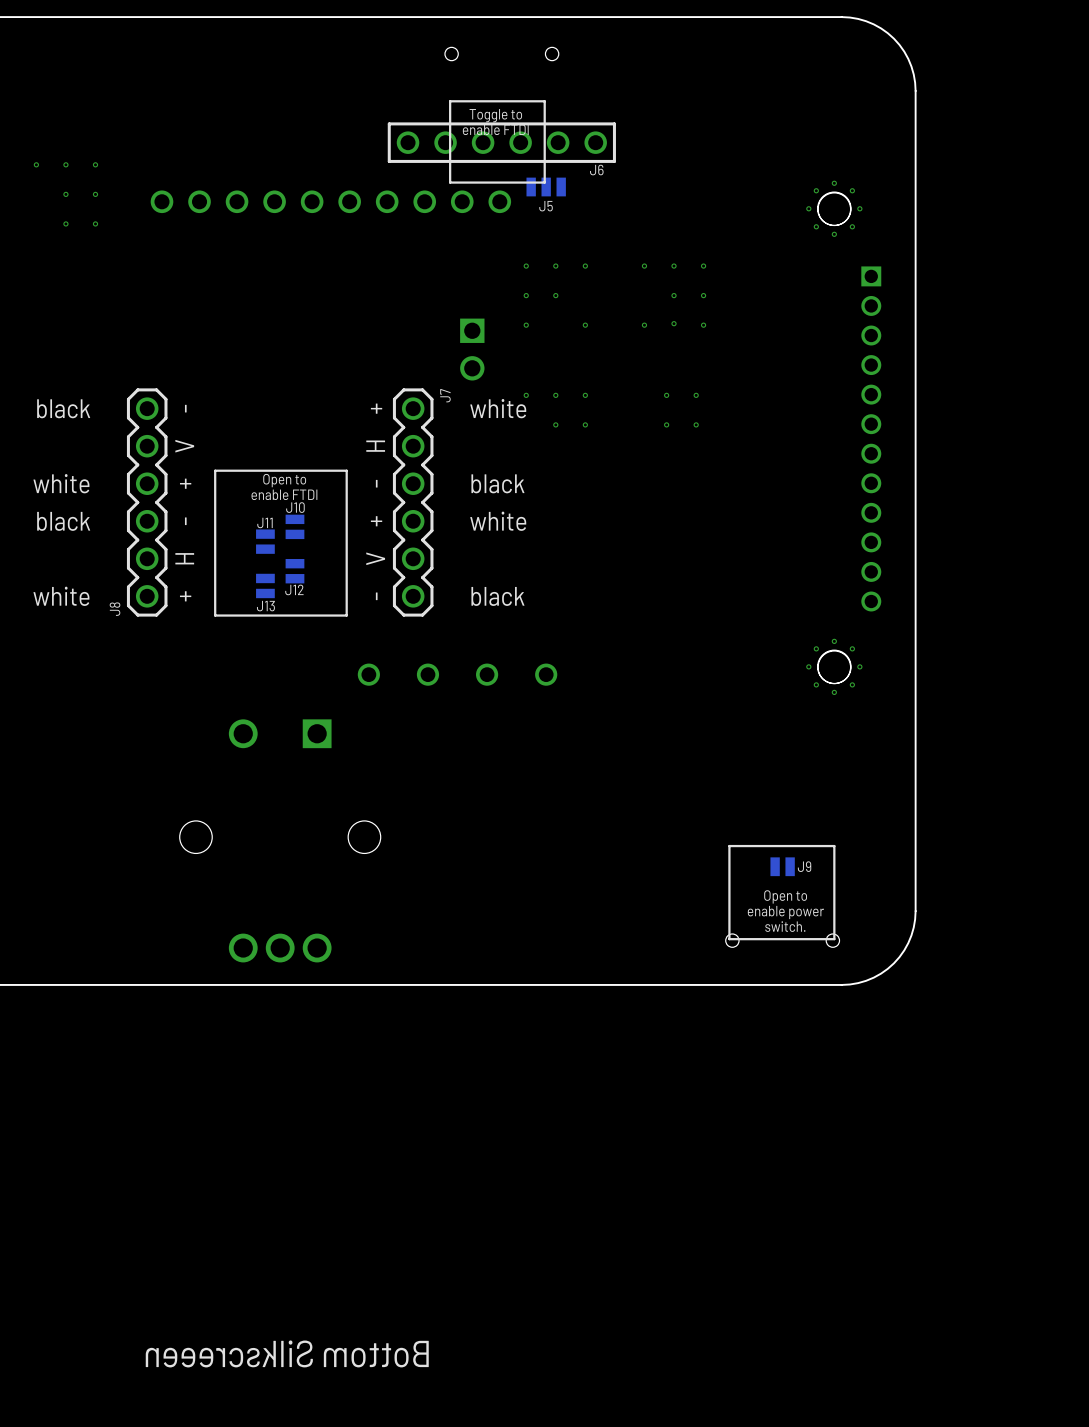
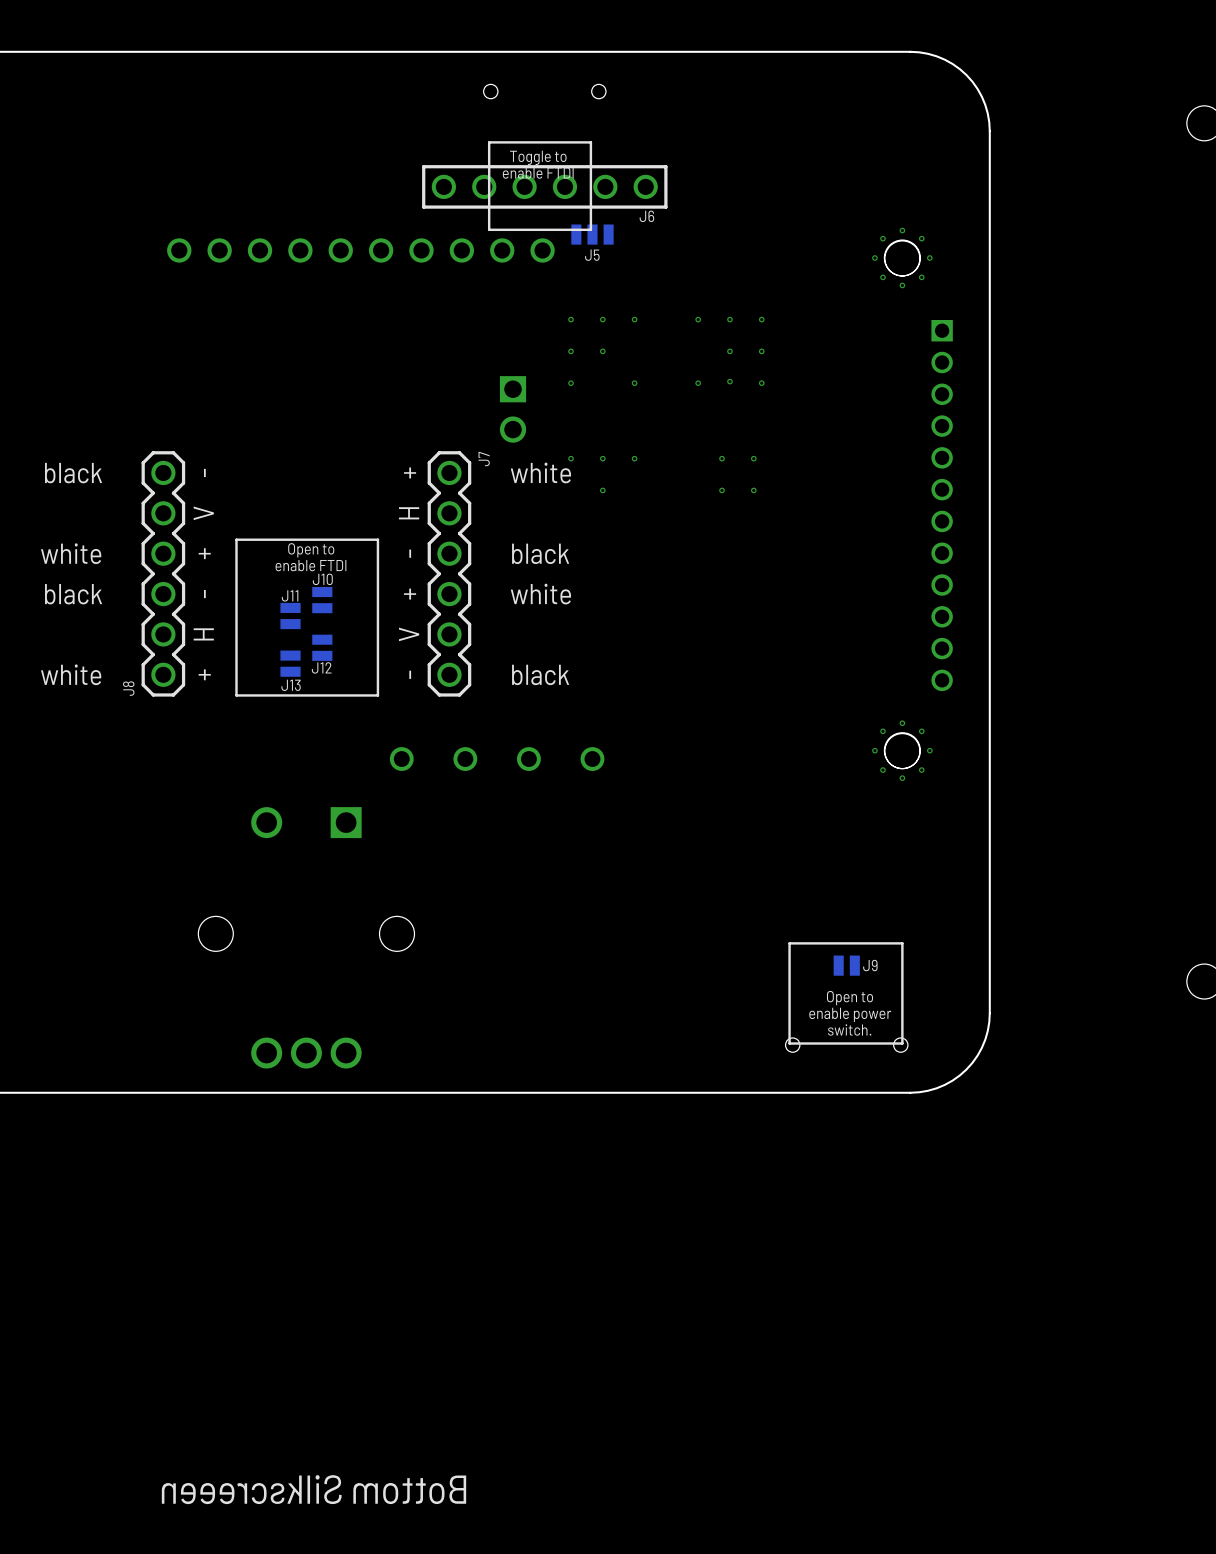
part: (36, 164) -> none
part: (65, 164) -> none
part: (95, 164) -> none
part: (65, 194) -> none
part: (95, 194) -> none
part: (65, 223) -> none
part: (95, 223) -> none
part: (585, 424) -> none

